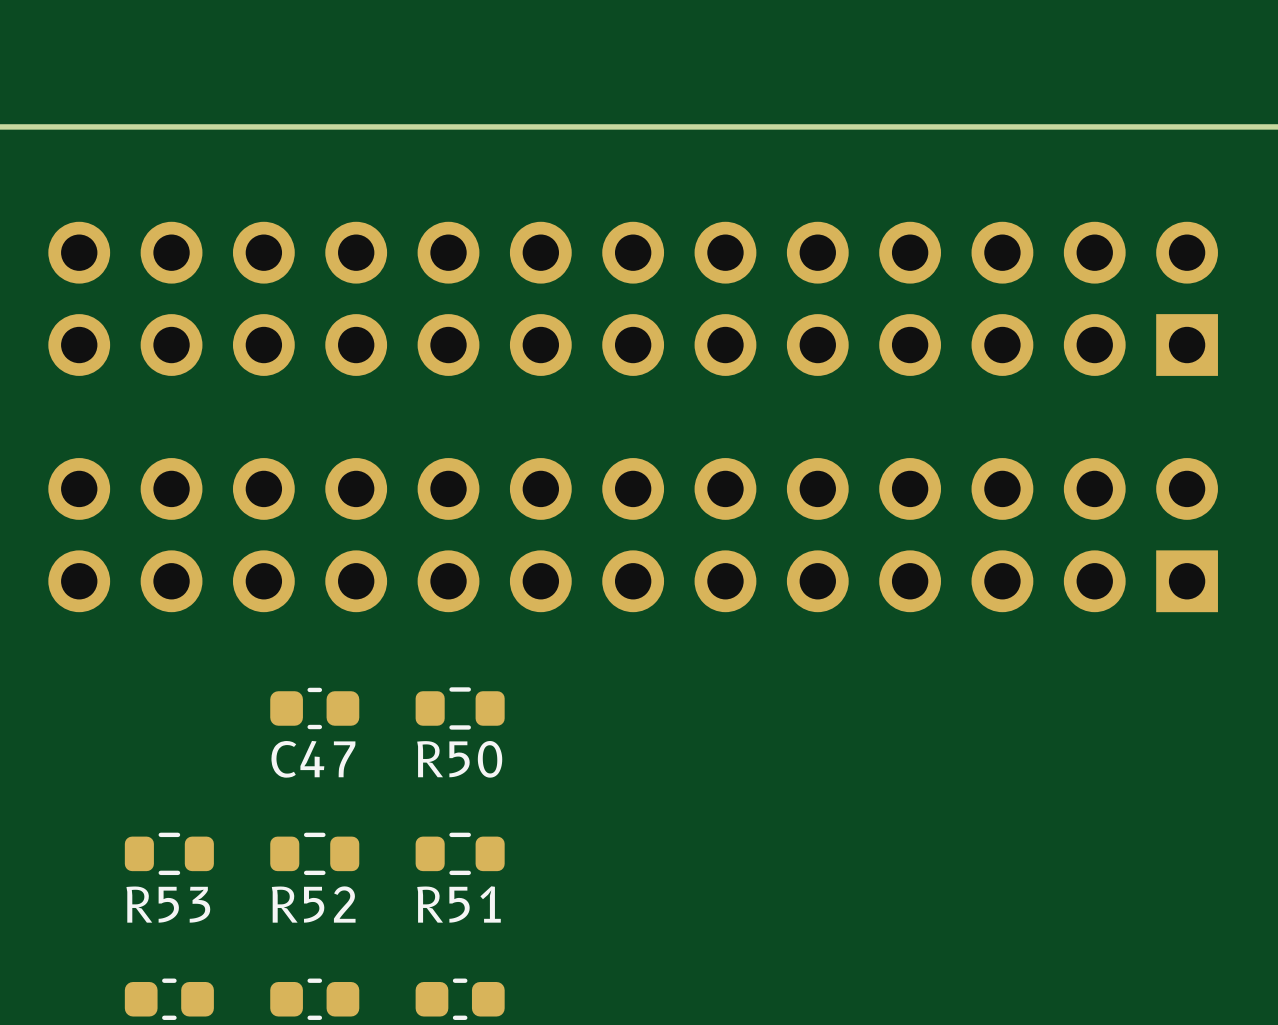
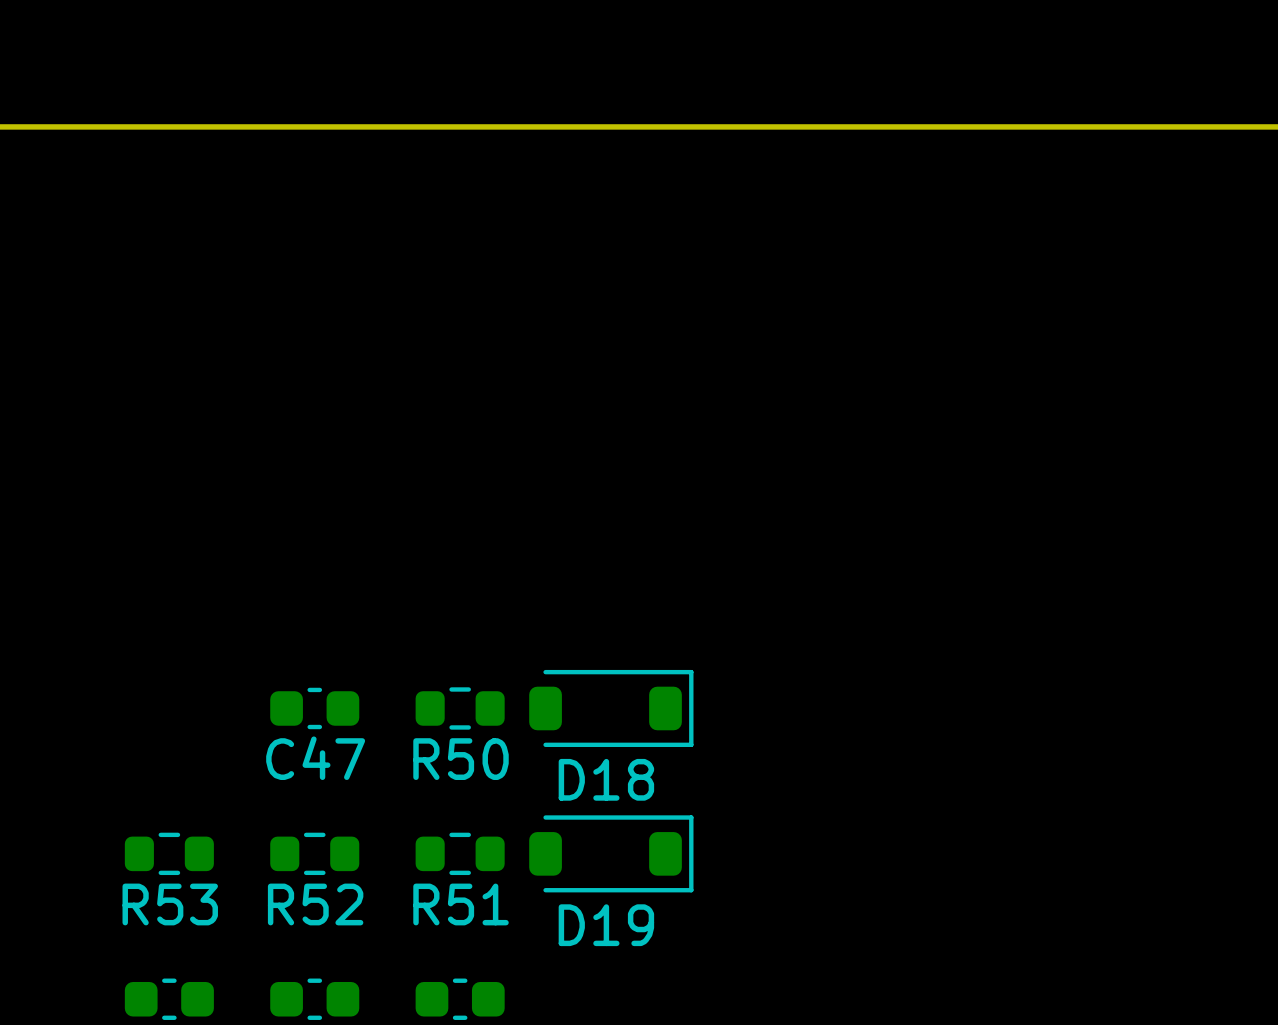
part: (633, 298) -> none
part: (633, 535) -> none
D18: none -> (611, 708)
D19: none -> (611, 853)

